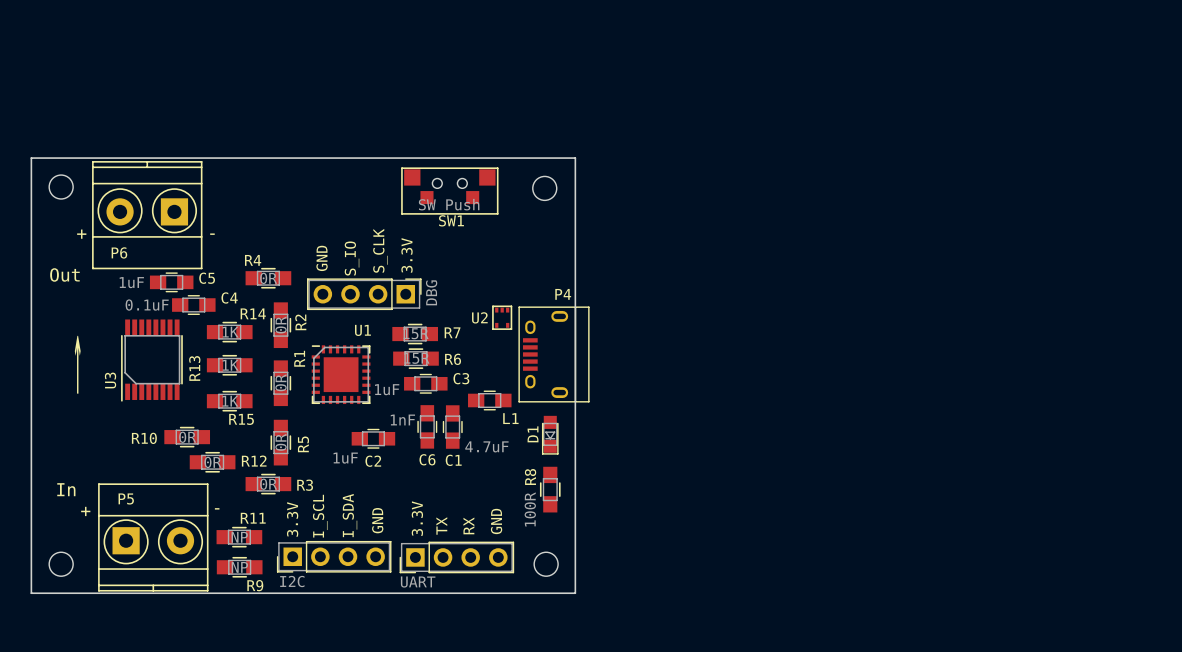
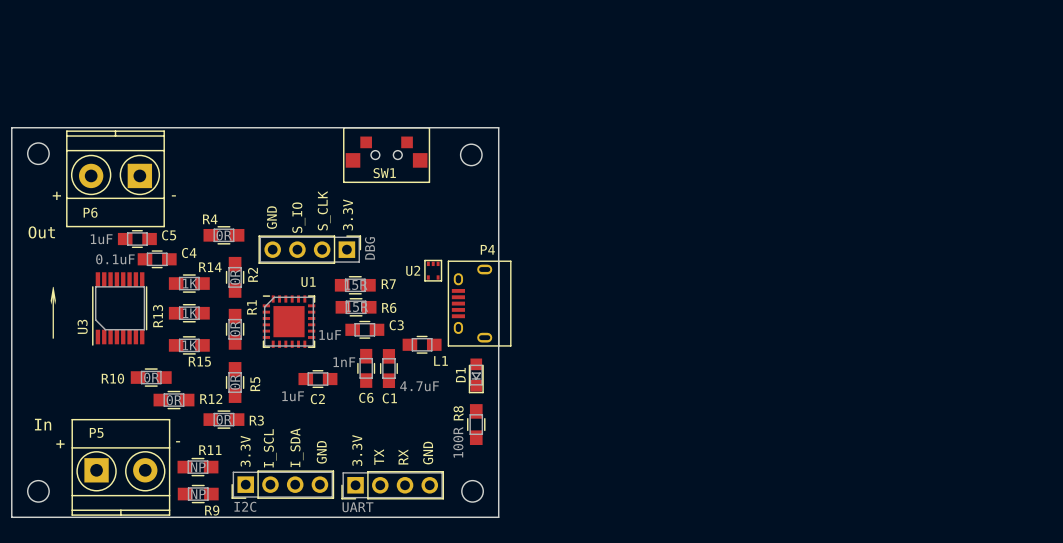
SW1 footprint: [401, 167, 499, 215] -> [343, 127, 431, 184]
SW1 value: SW_Push (449, 206) -> none

